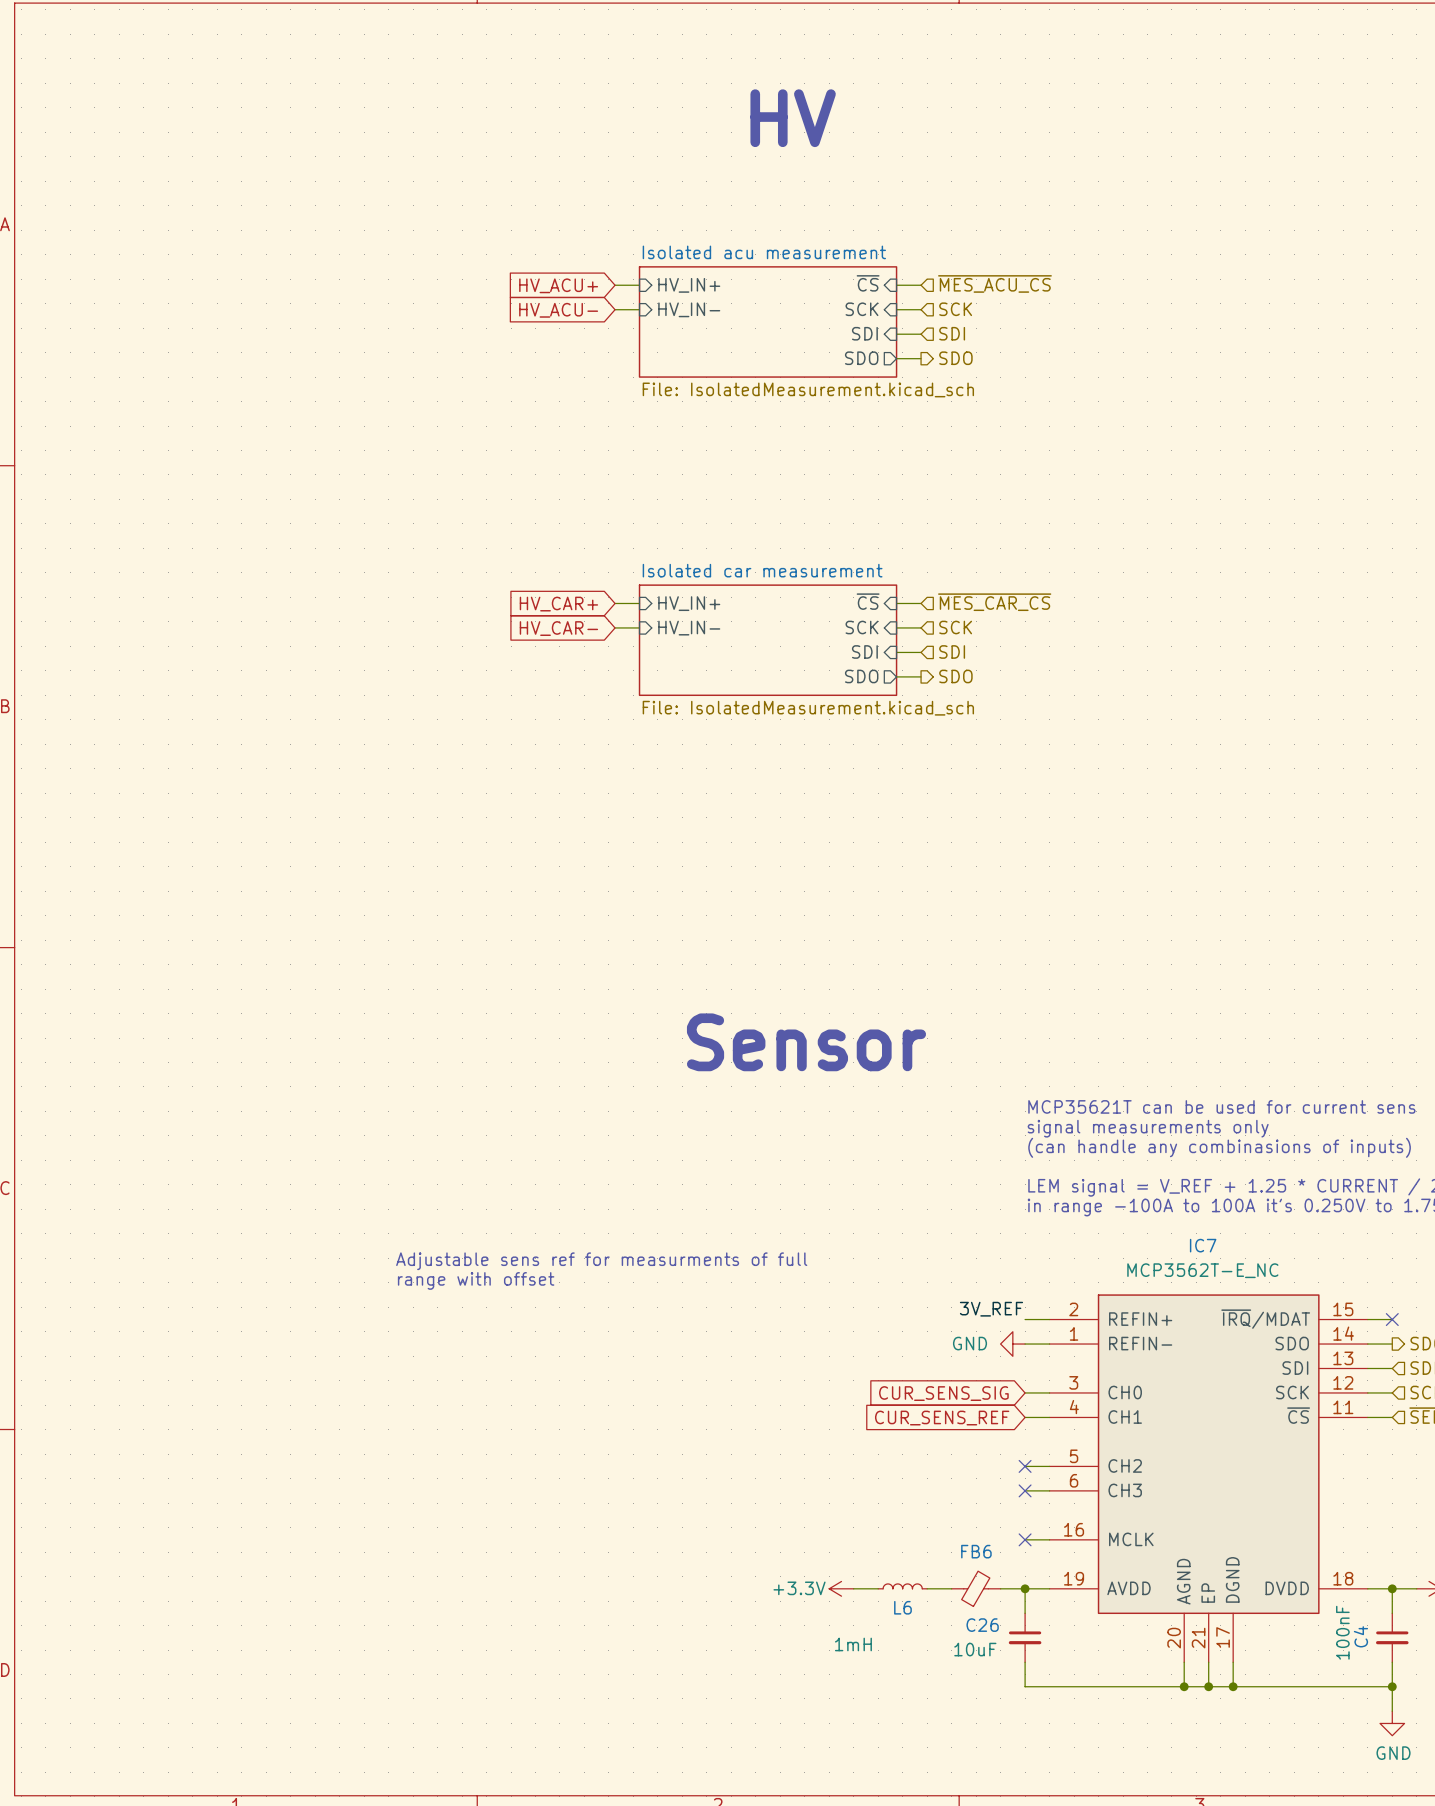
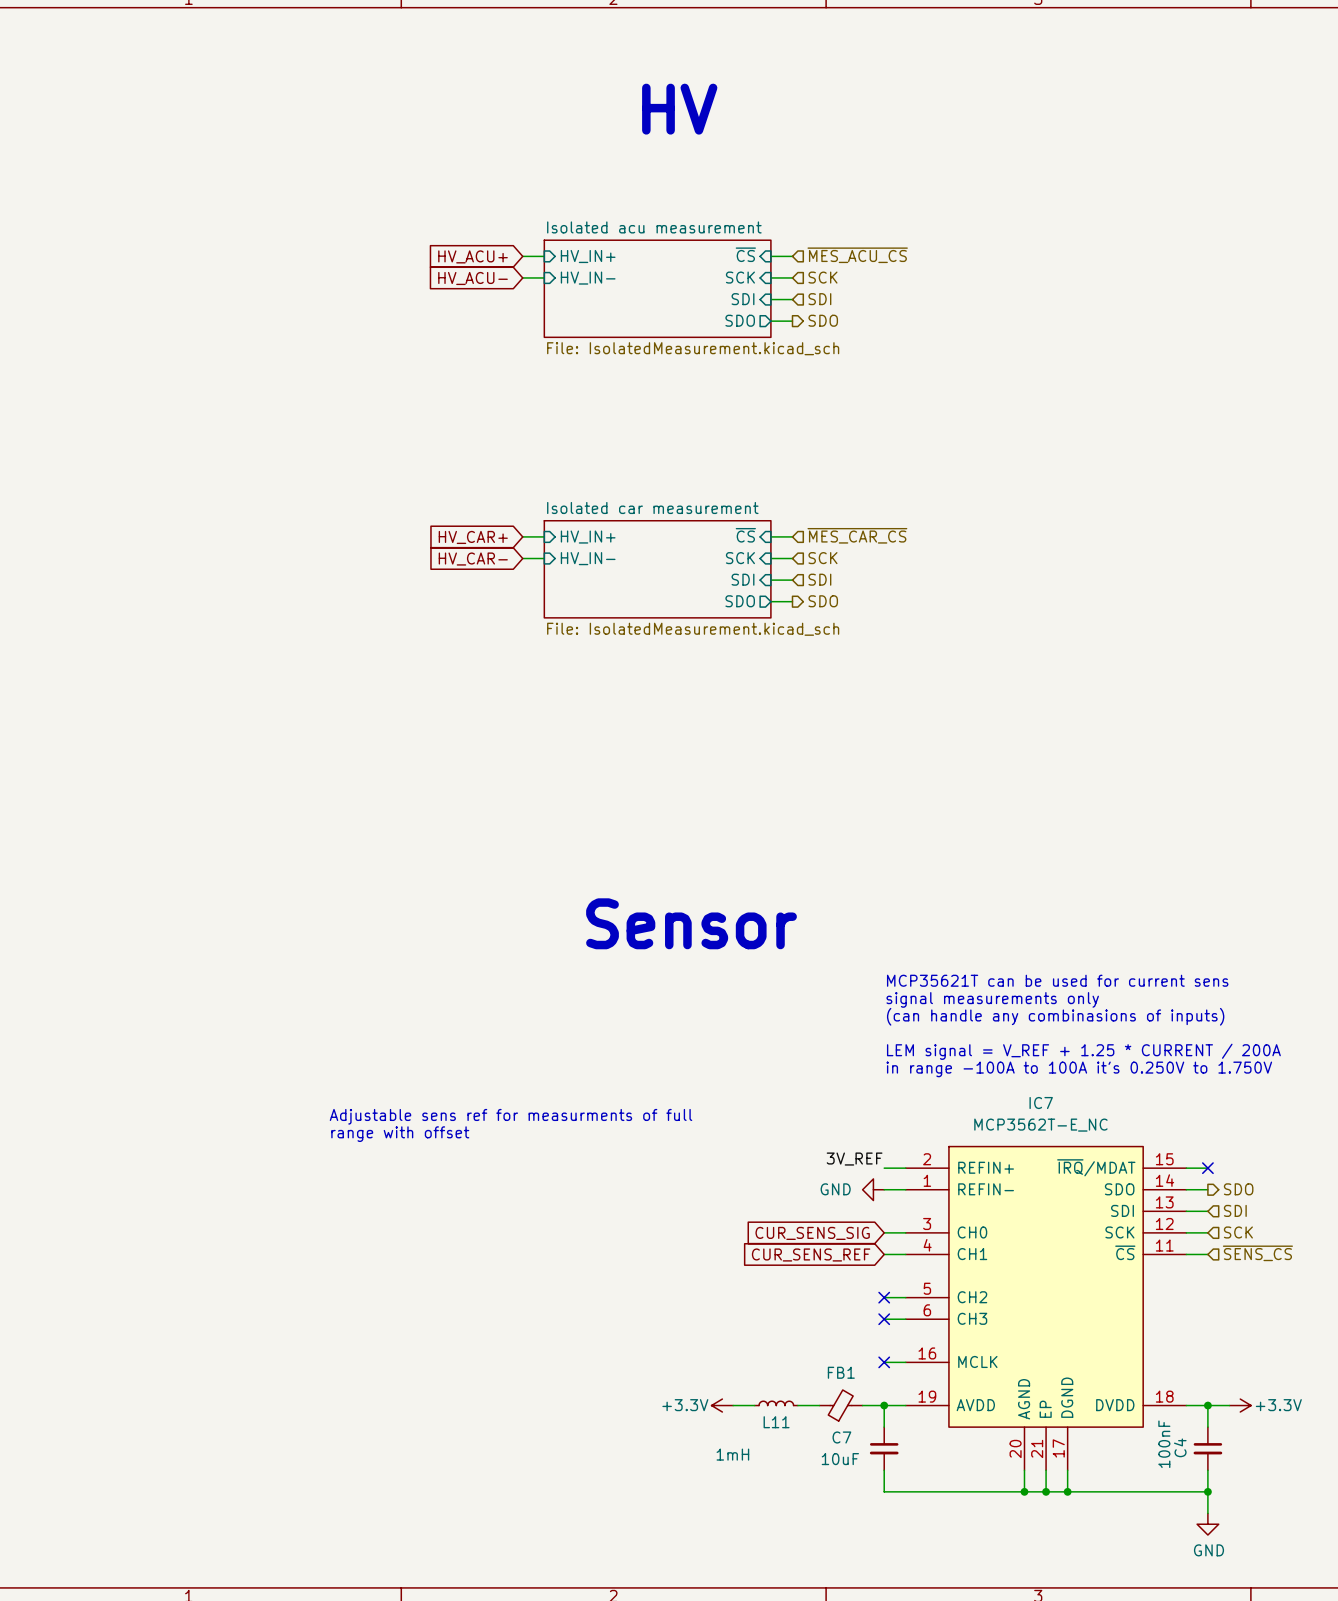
FB6 name: FB6 (976, 1551) -> FB1 (841, 1372)
L6 name: L6 (902, 1607) -> L11 (776, 1422)
C26 name: C26 (982, 1625) -> C7 (841, 1437)

